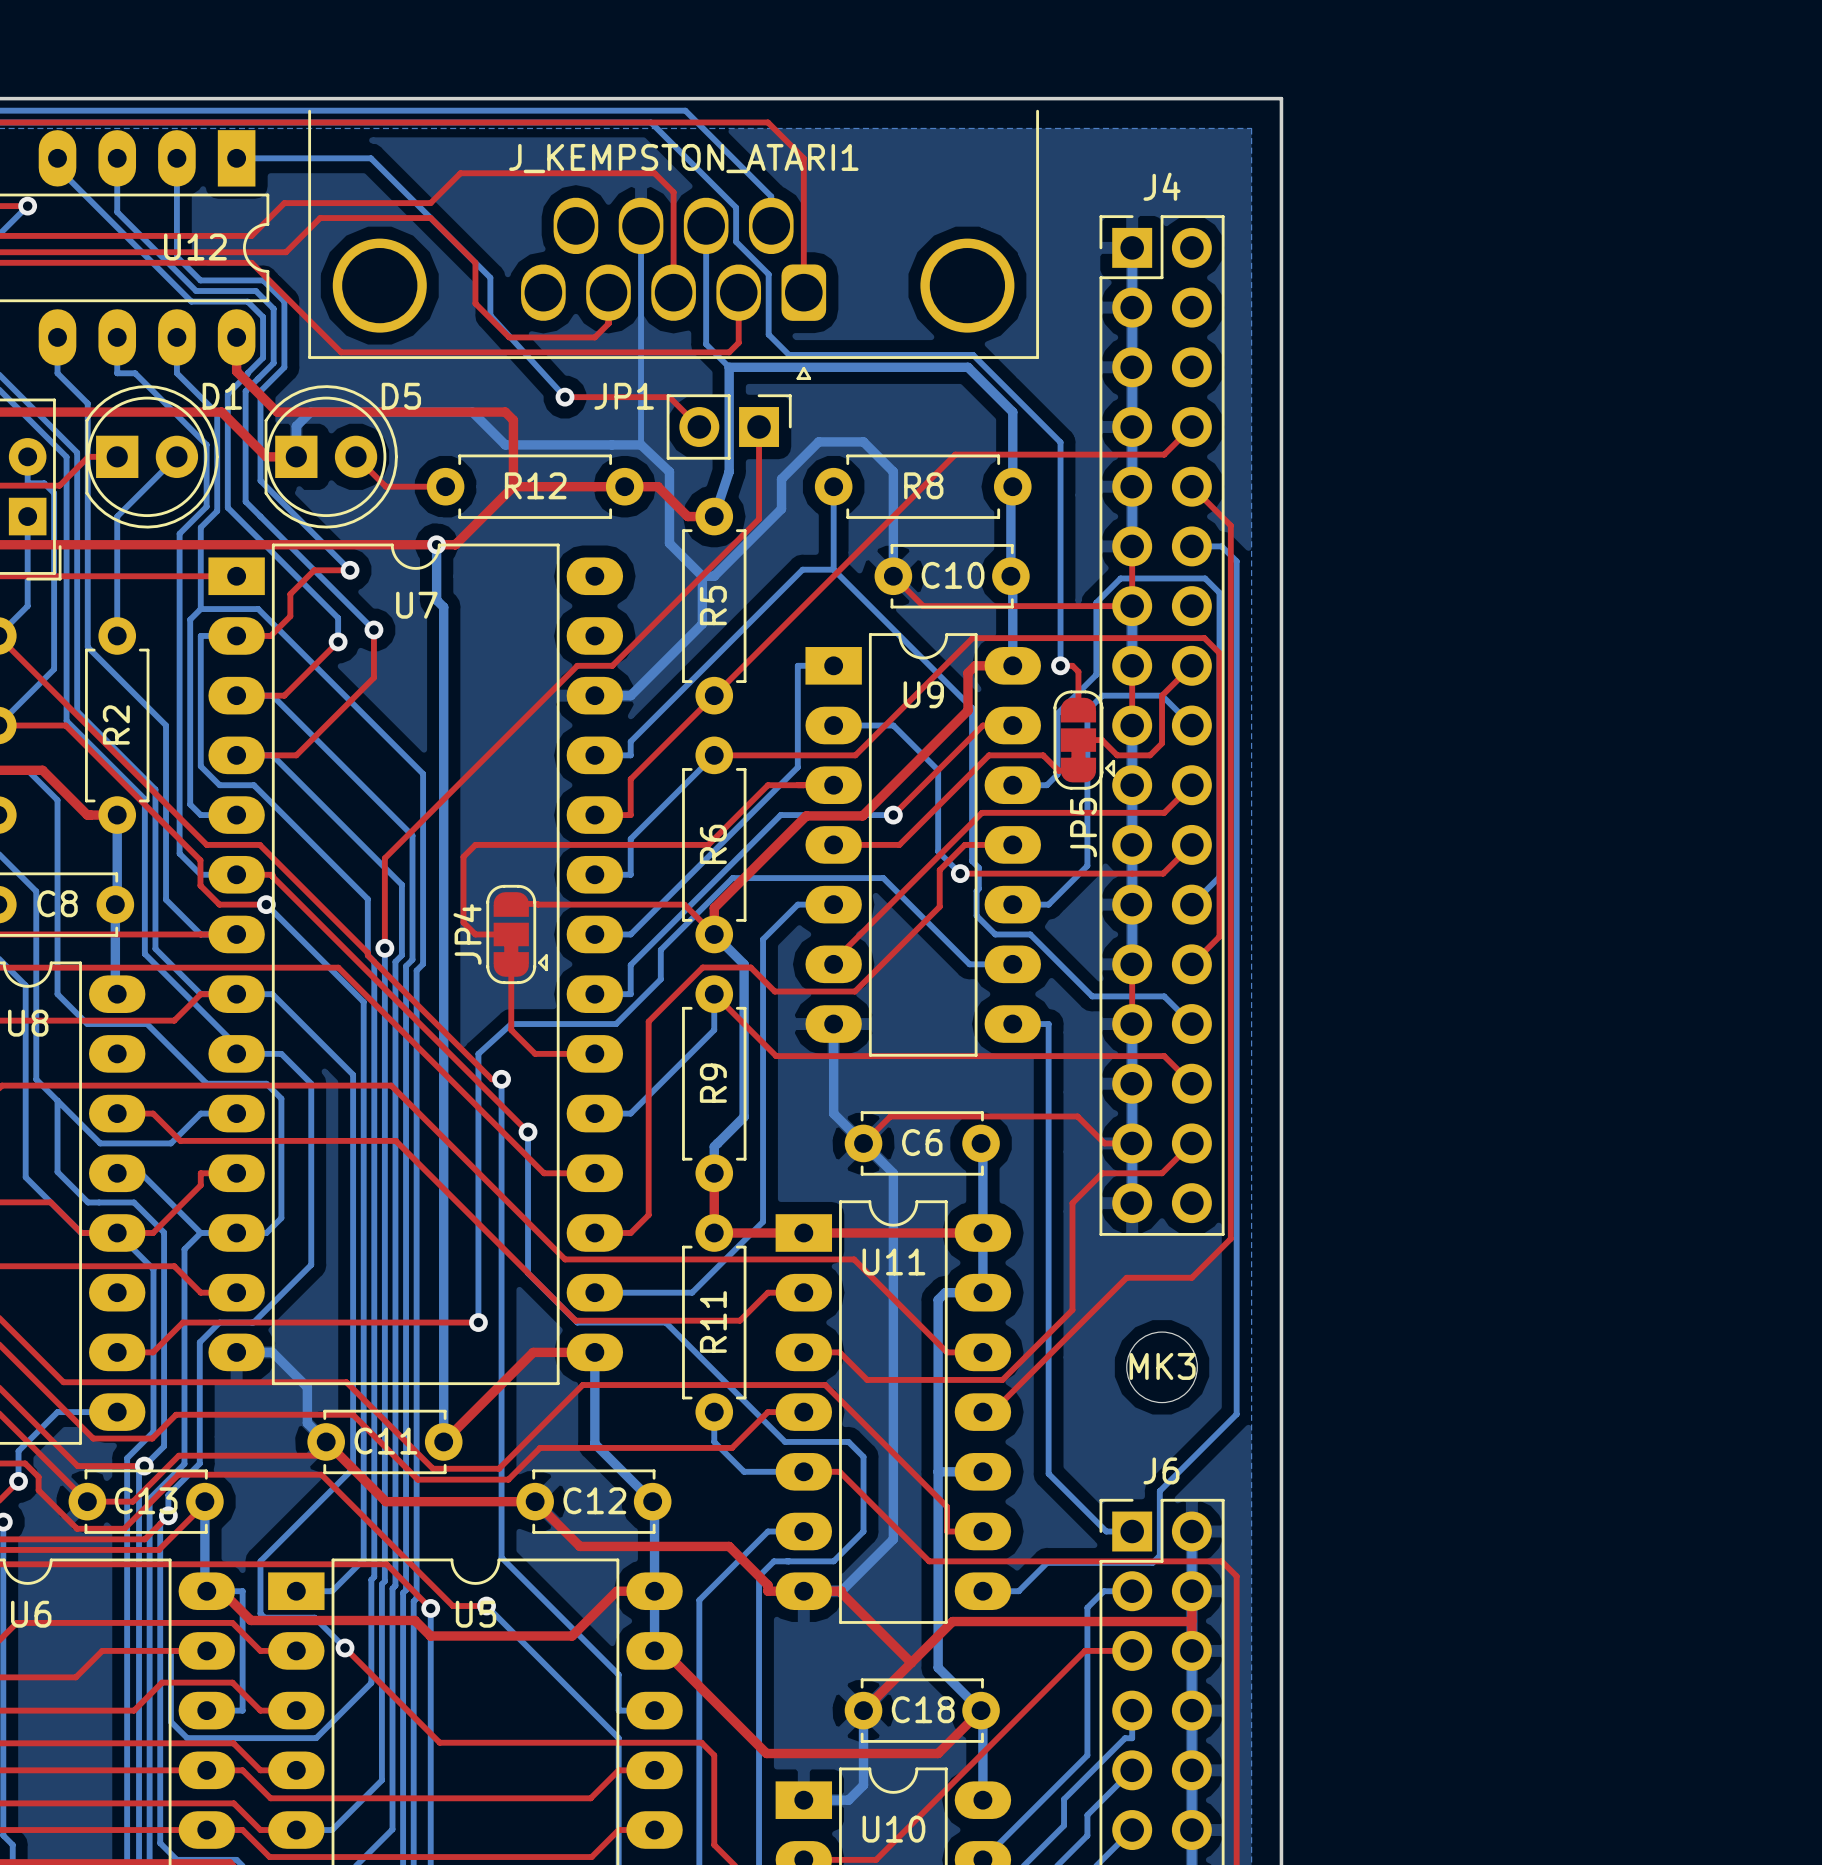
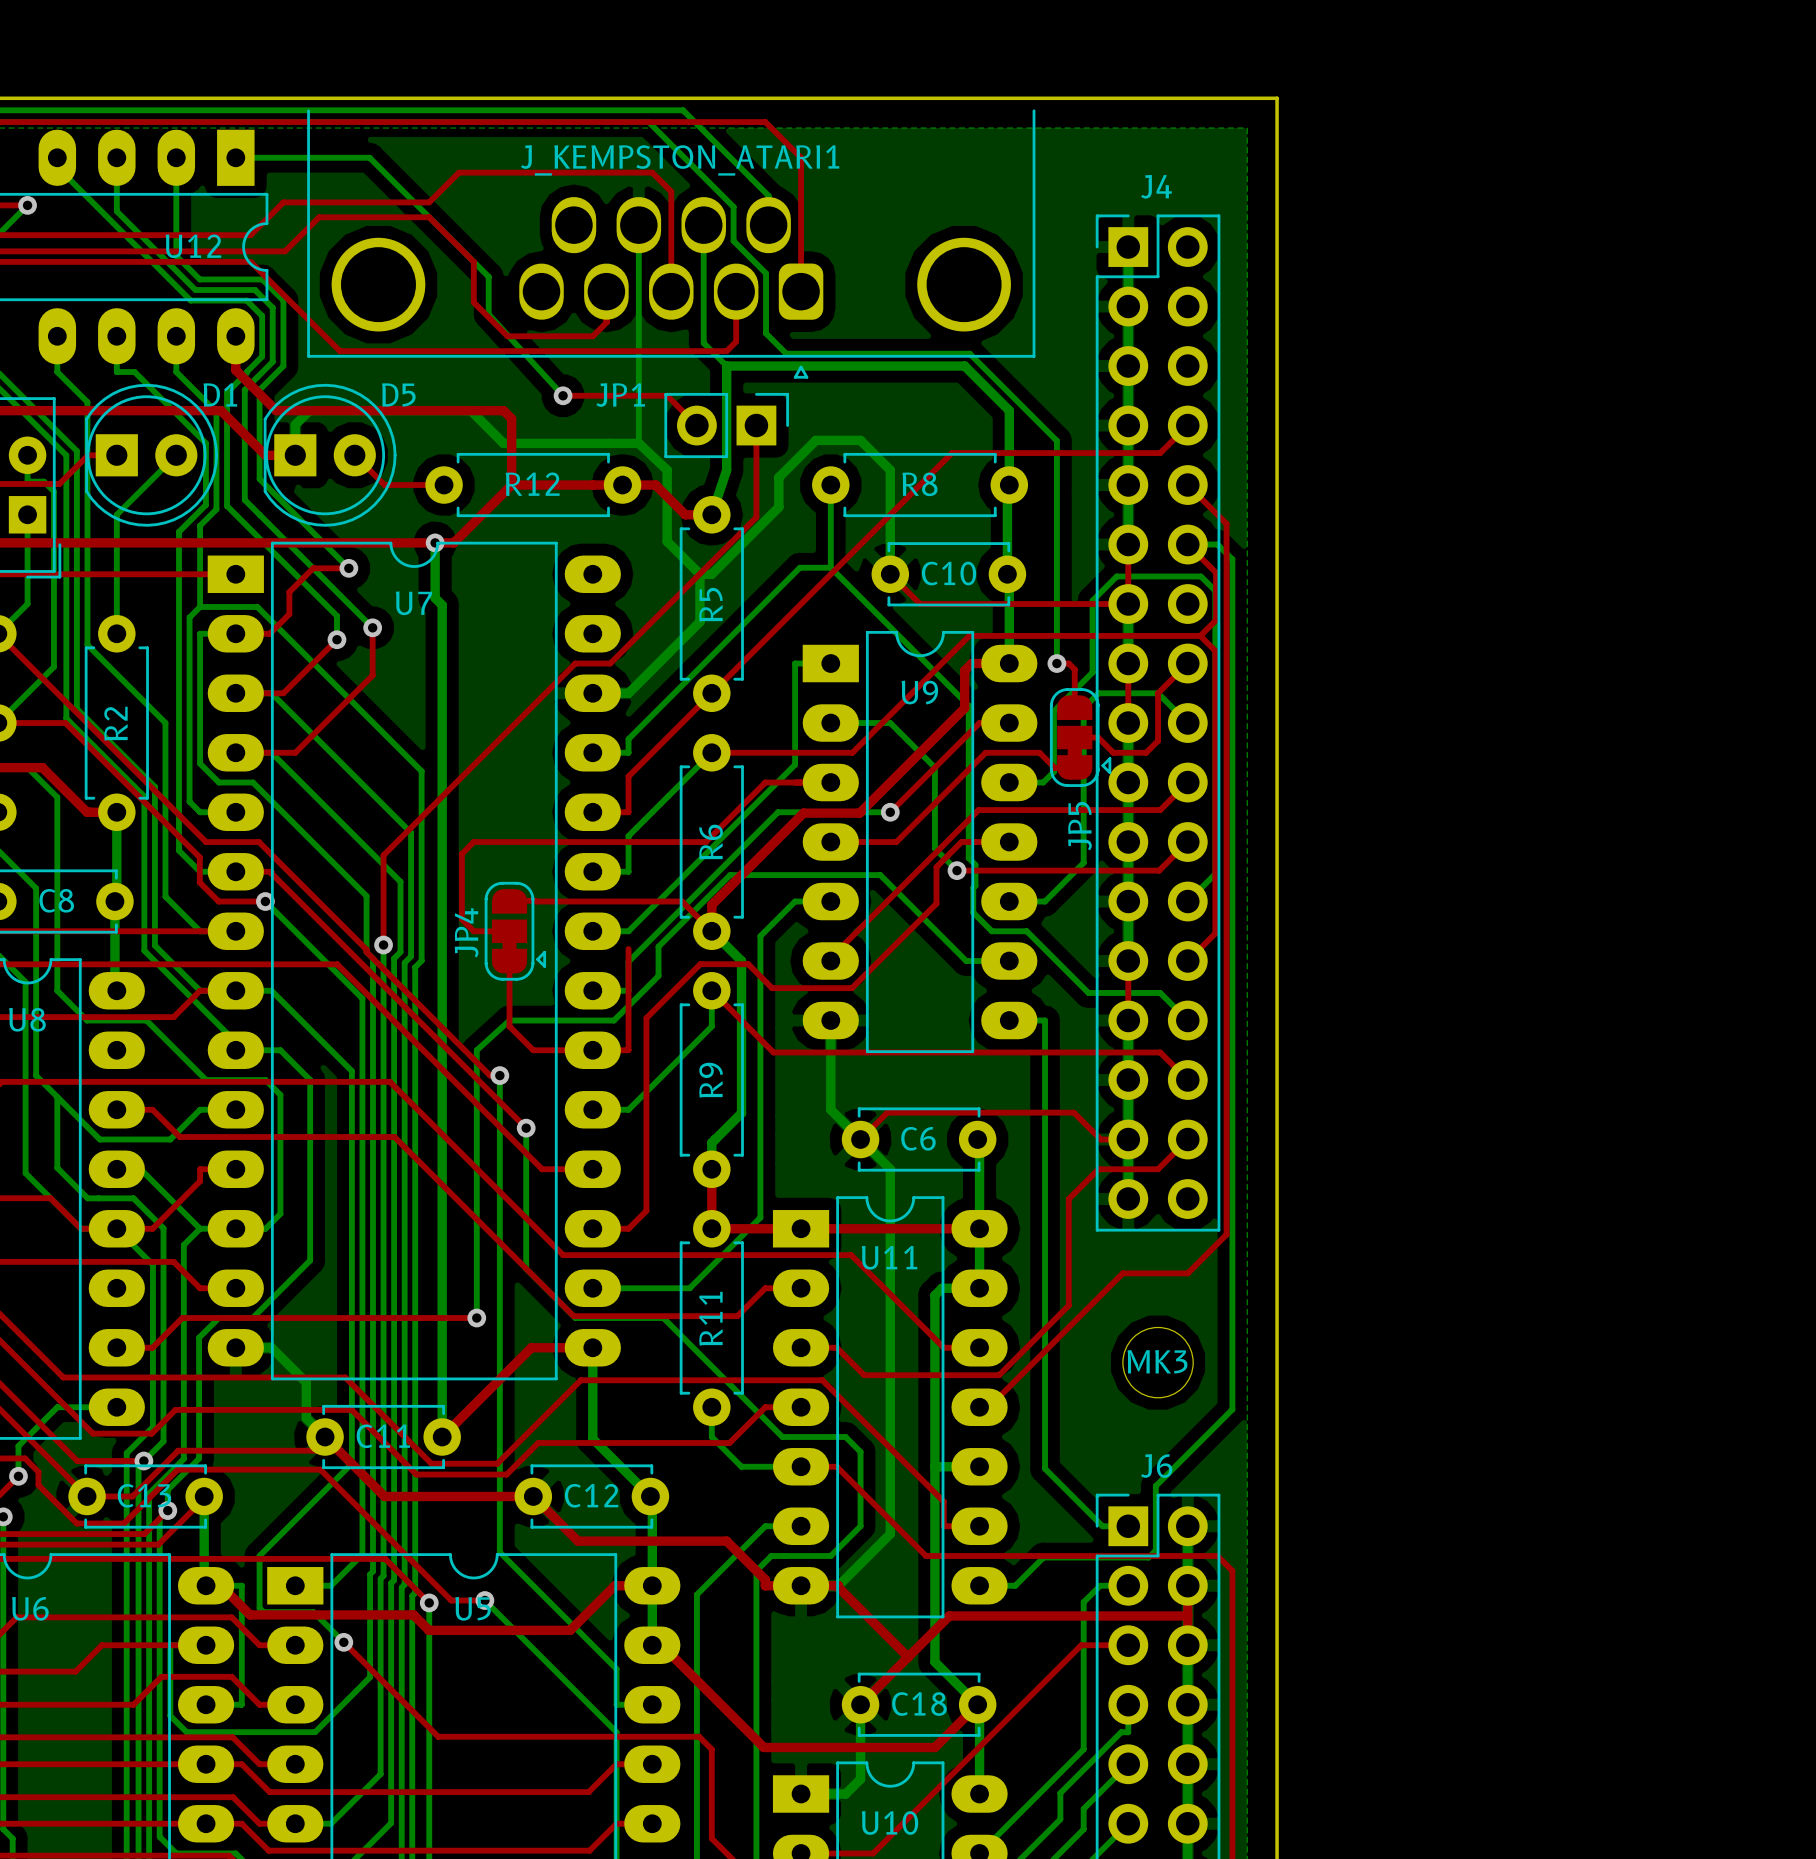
top track: none -> (1187, 544) (1216, 572) (1216, 620) (1200, 635)
top track: none -> (628, 949) (628, 1050) (592, 1050)

